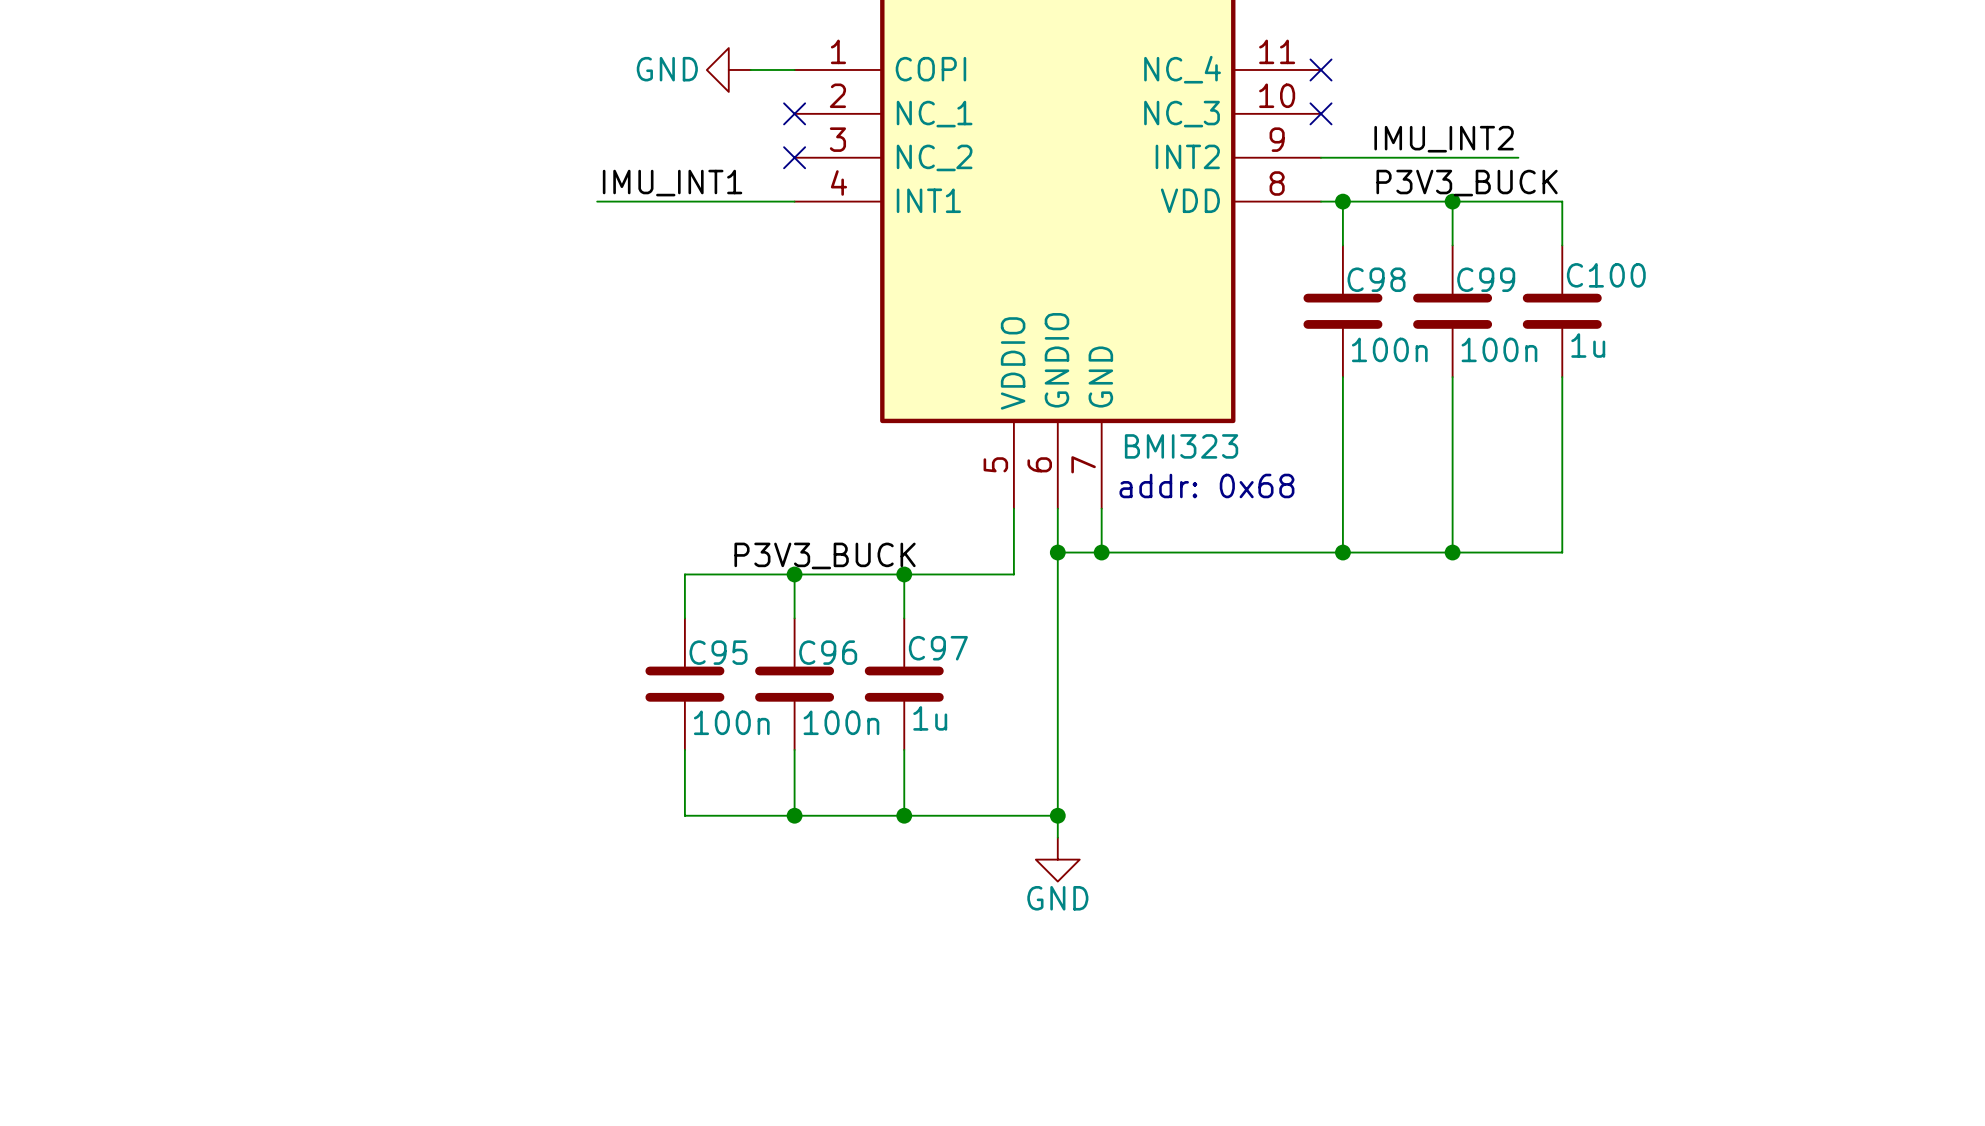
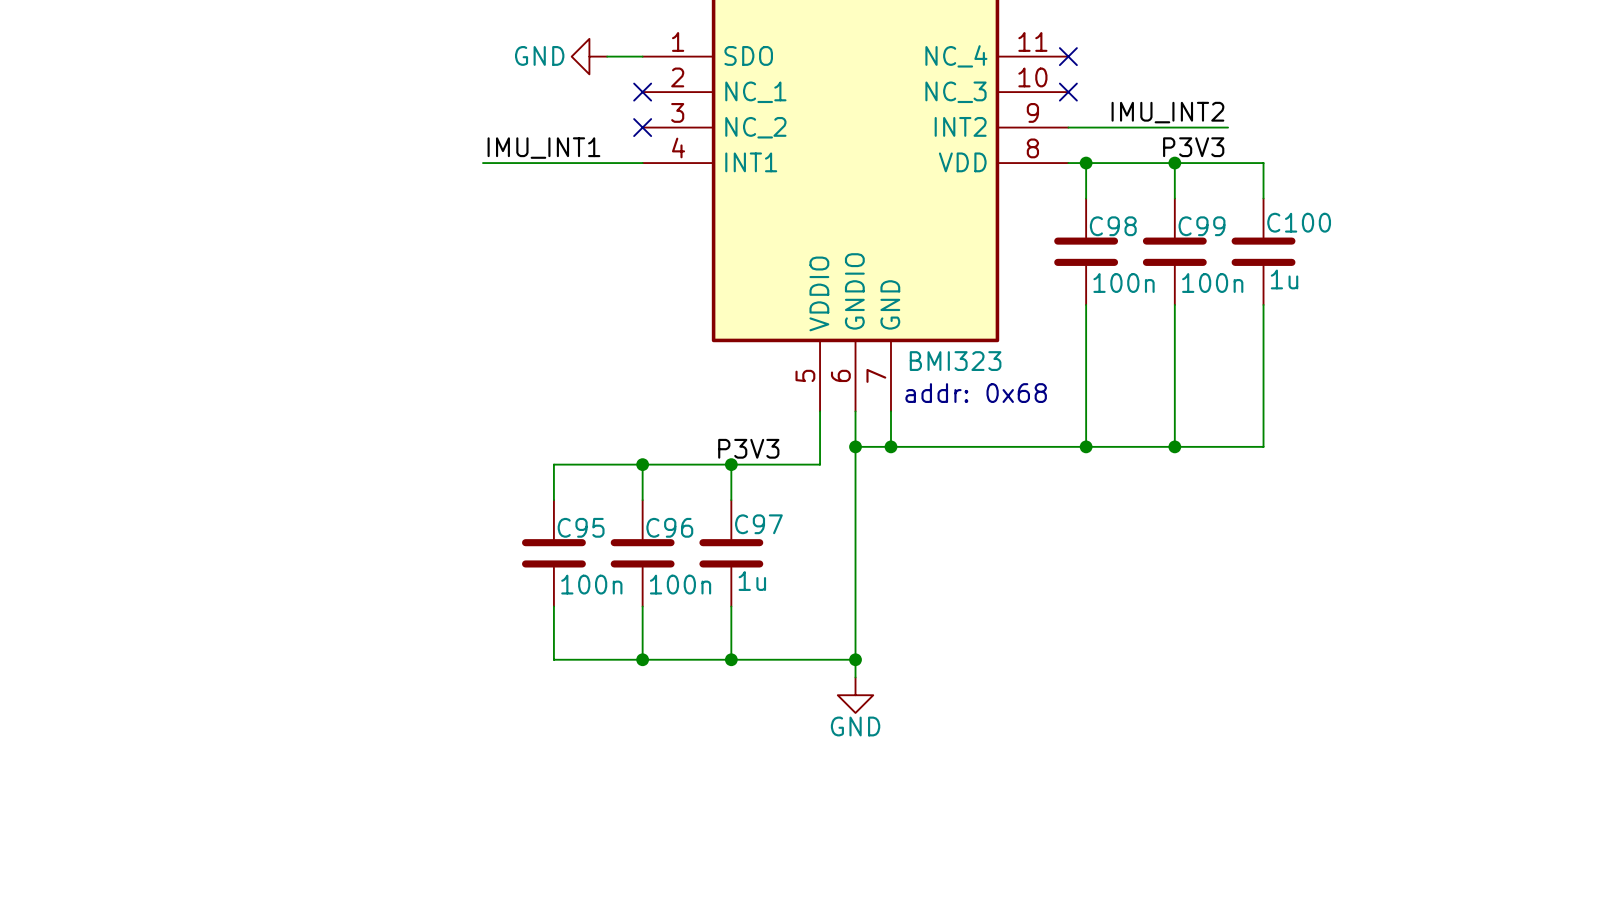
part pin name: COPI (930, 69) -> SDO (748, 55)
label: P3V3_BUCK (1467, 183) -> P3V3 (1193, 147)
label: P3V3_BUCK (825, 555) -> P3V3 (748, 448)

